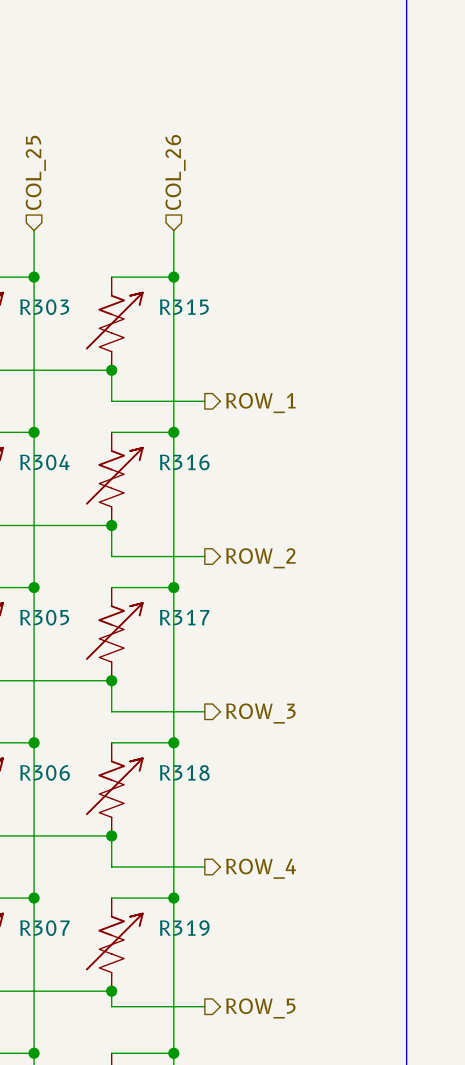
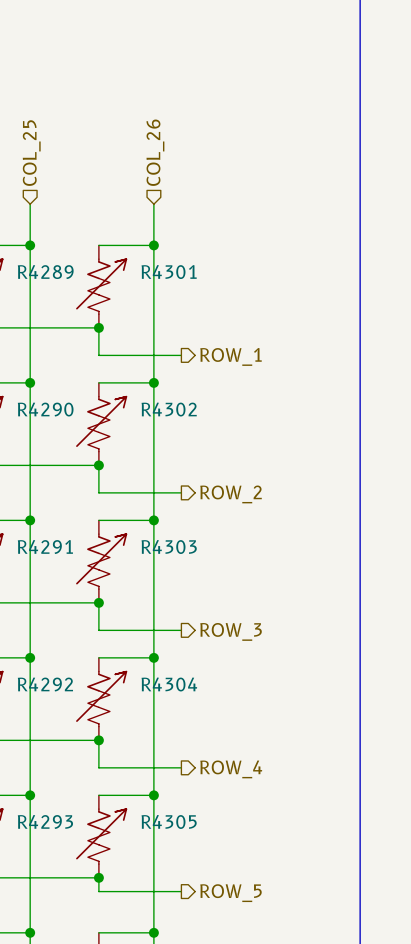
R303 name: R303 (44, 307) -> R4289 (45, 272)
R315 name: R315 (184, 307) -> R4301 (169, 272)
R304 name: R304 (44, 462) -> R4290 (45, 409)
R316 name: R316 (184, 462) -> R4302 (169, 409)
R305 name: R305 (44, 617) -> R4291 (45, 547)
R317 name: R317 (184, 617) -> R4303 (169, 547)
R306 name: R306 (45, 772) -> R4292 (45, 684)
R318 name: R318 (184, 772) -> R4304 (169, 684)
R307 name: R307 (44, 928) -> R4293 (45, 821)
R319 name: R319 (184, 928) -> R4305 (169, 821)

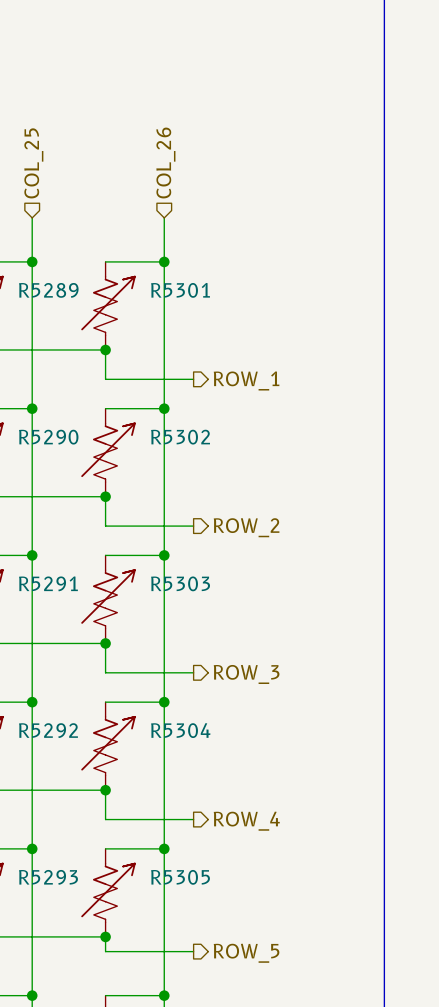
R4289 name: R4289 (45, 272) -> R5289 (48, 290)
R4301 name: R4301 (169, 272) -> R5301 (180, 290)
R4290 name: R4290 (45, 409) -> R5290 (48, 437)
R4302 name: R4302 (169, 409) -> R5302 (180, 437)
R4291 name: R4291 (45, 547) -> R5291 (48, 583)
R4303 name: R4303 (169, 547) -> R5303 (180, 583)
R4292 name: R4292 (45, 684) -> R5292 (48, 730)
R4304 name: R4304 (169, 684) -> R5304 (180, 730)
R4293 name: R4293 (45, 821) -> R5293 (48, 877)
R4305 name: R4305 (169, 821) -> R5305 (180, 877)

